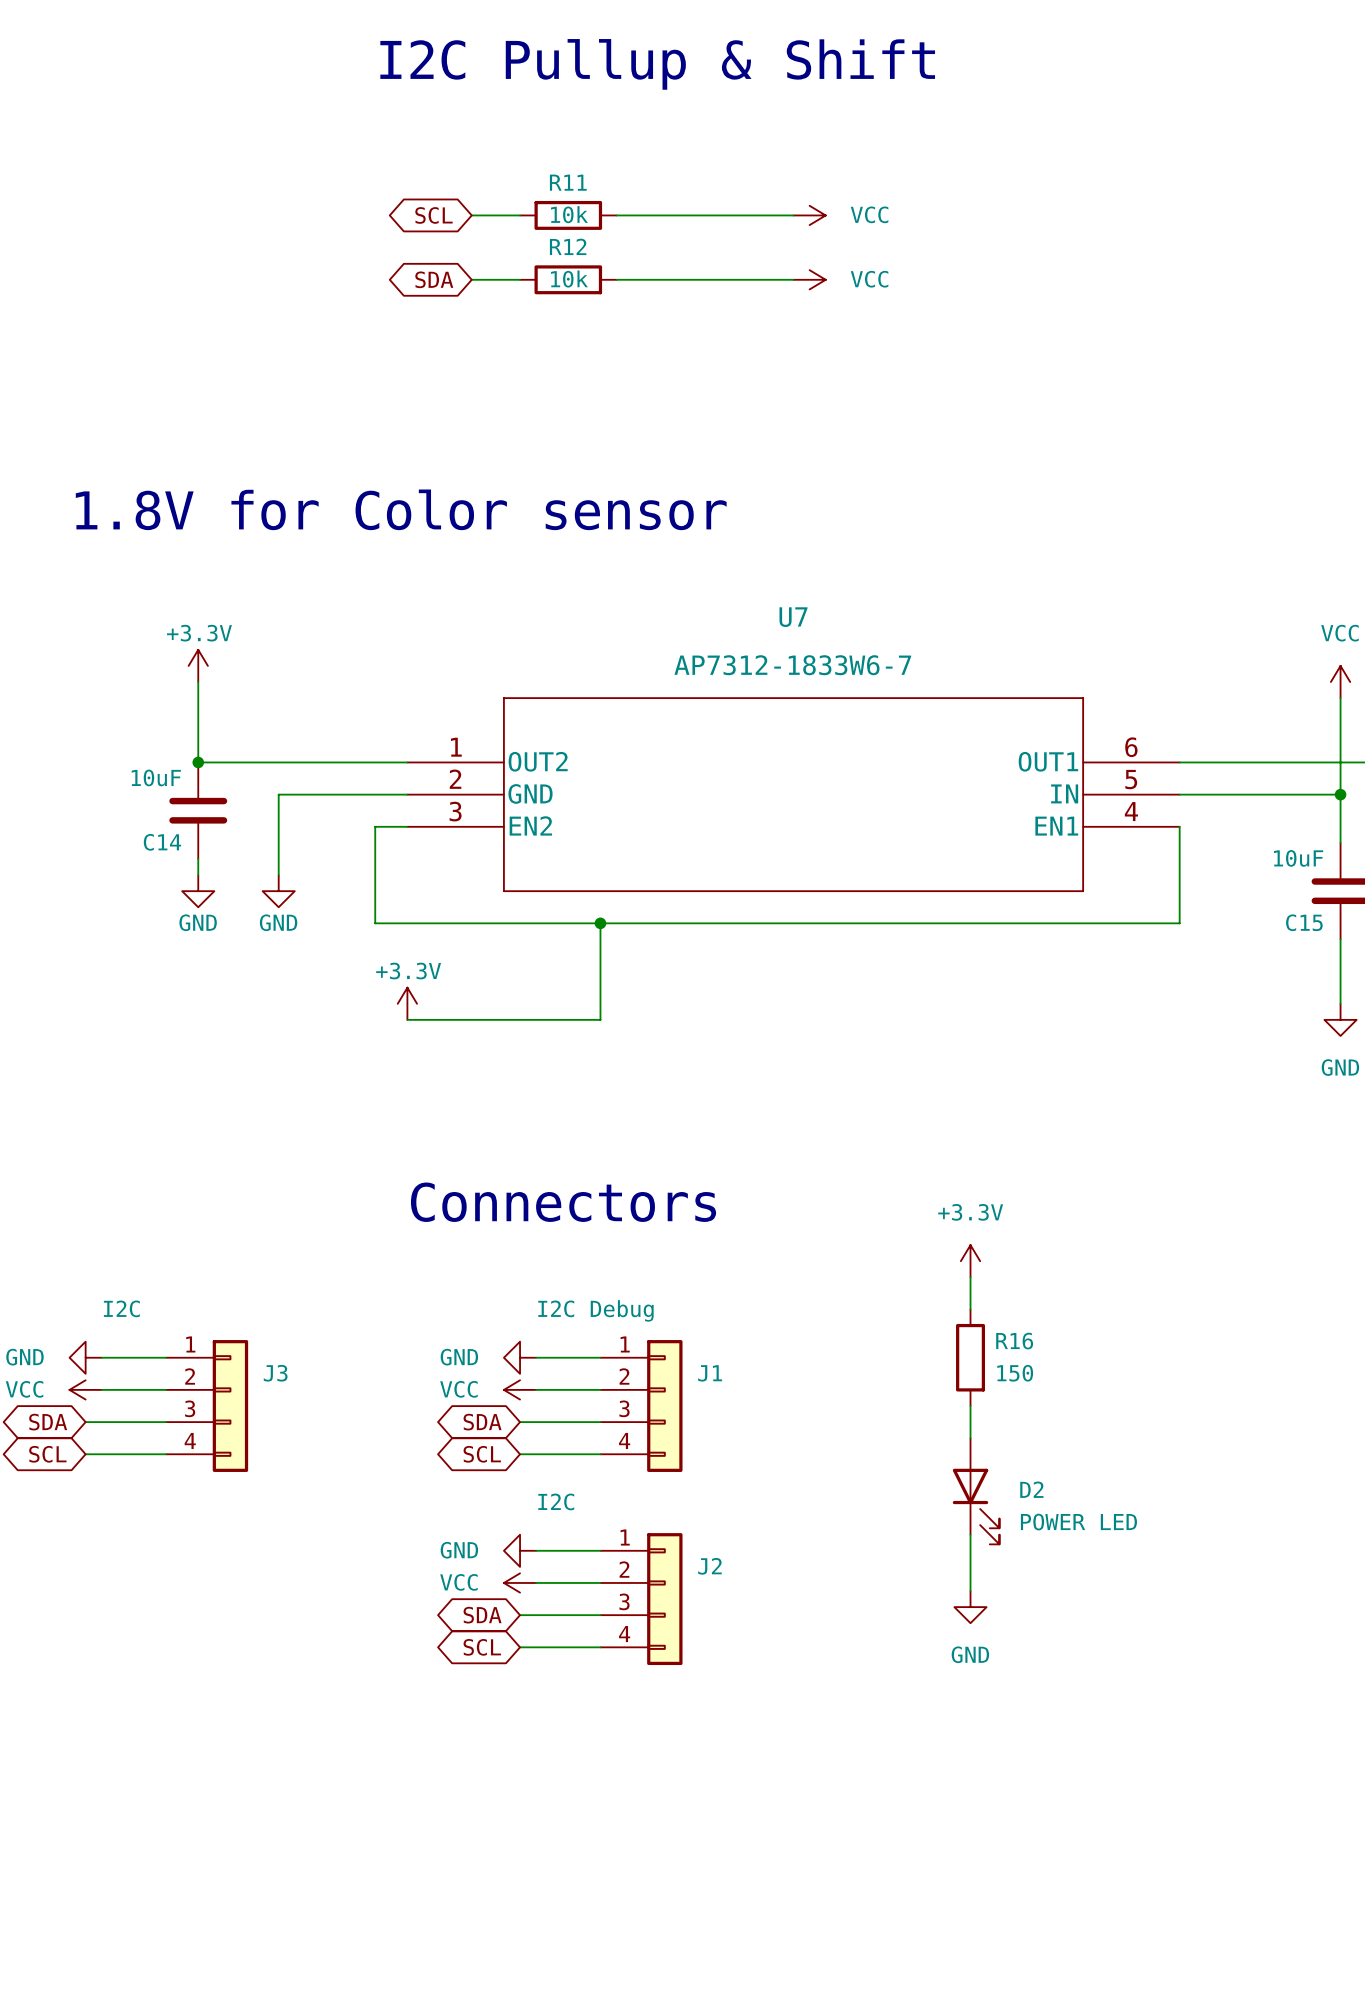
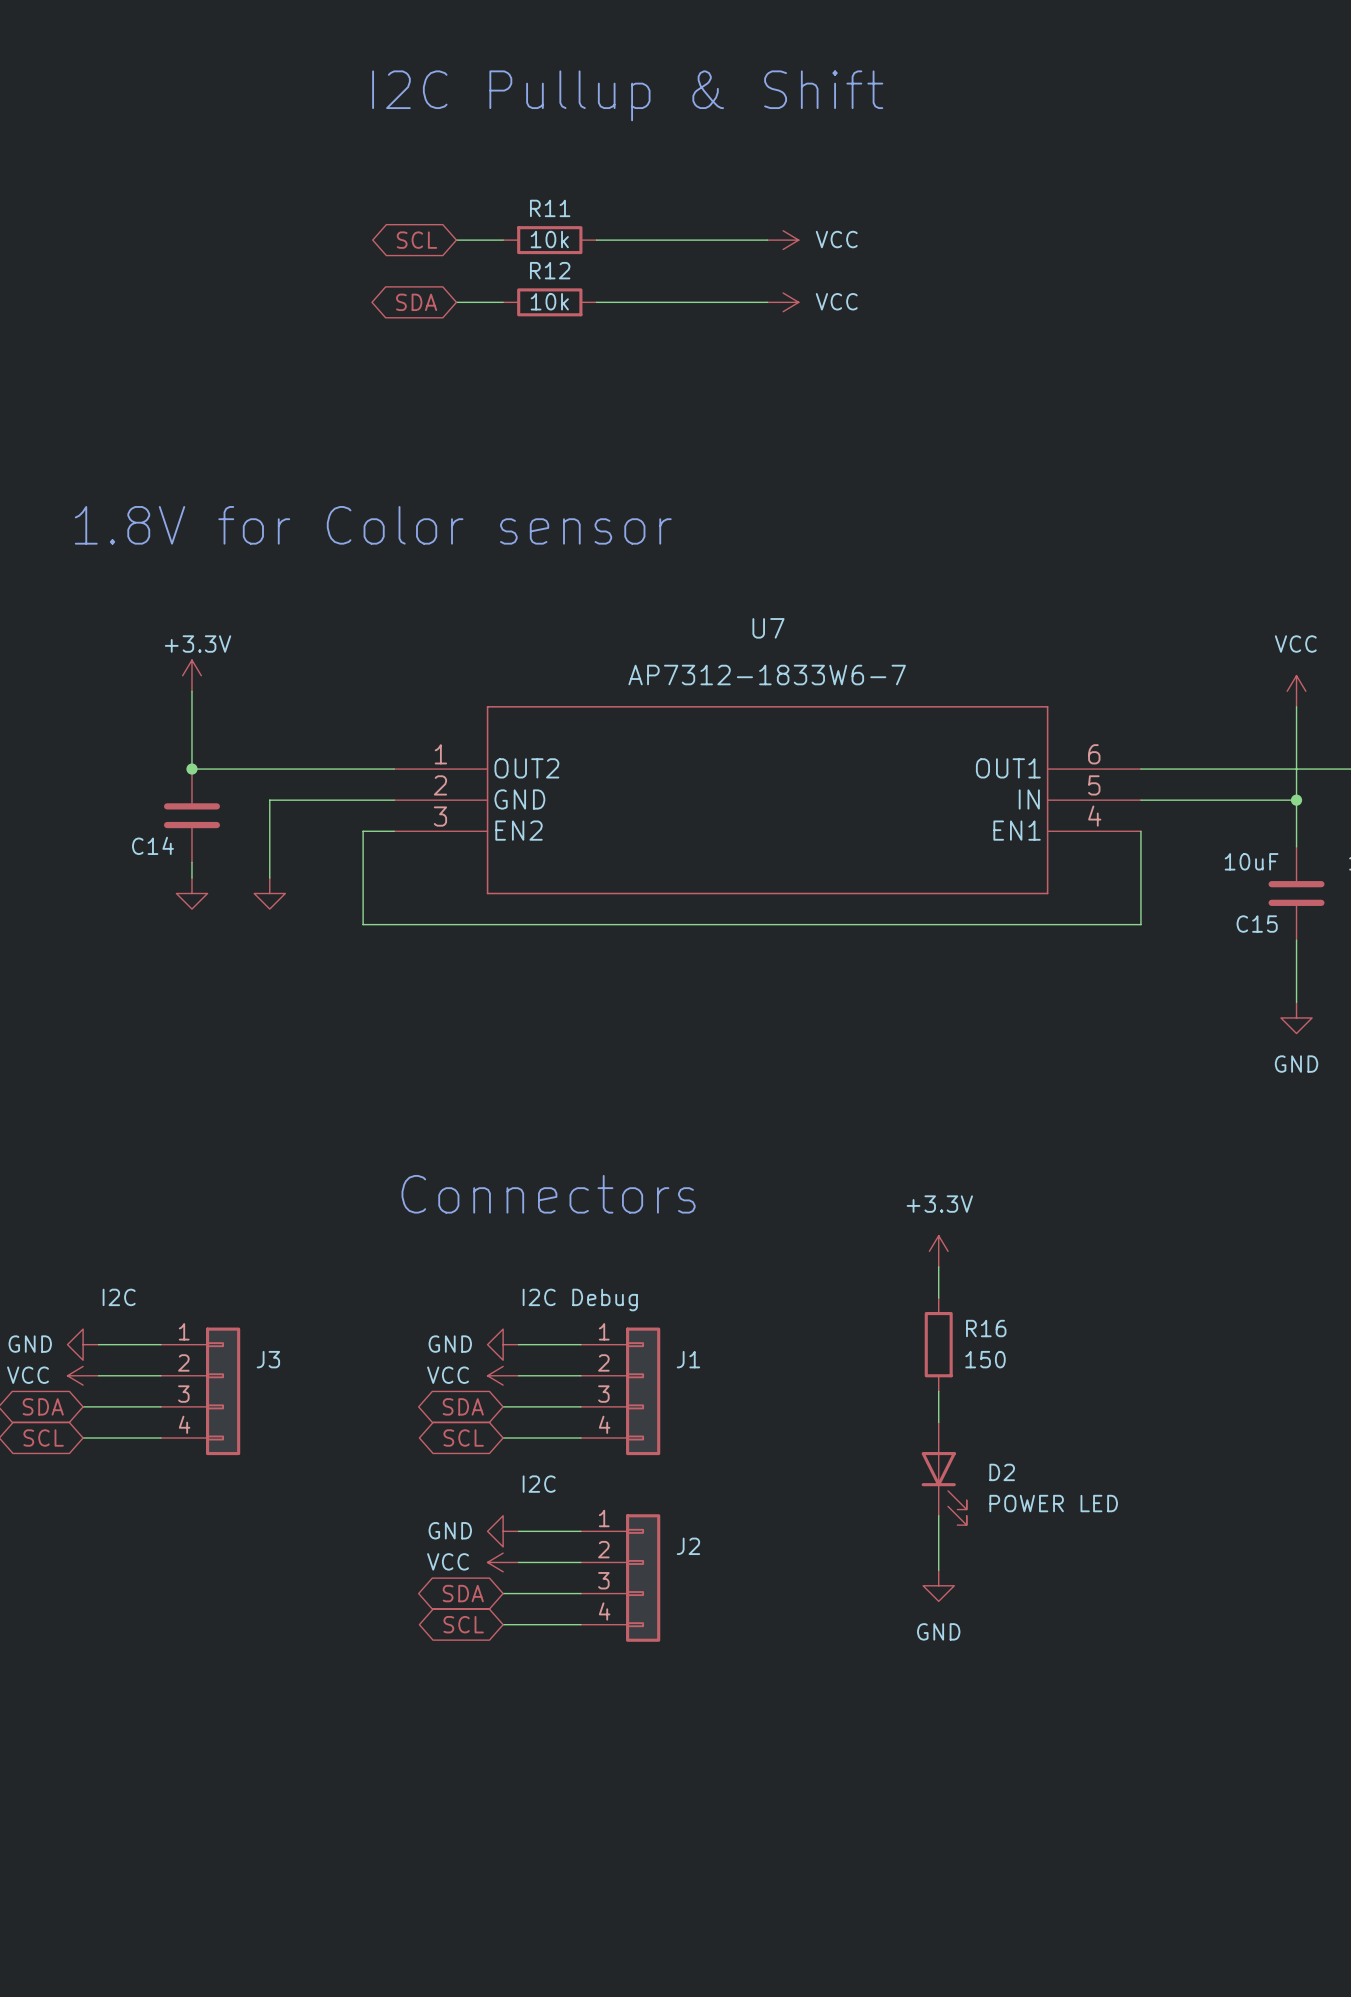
C14 value: 10uF (156, 777) -> none
power symbol text: GND (198, 922) -> none
power symbol text: GND (278, 922) -> none
wire: (600, 923) (600, 1019) (407, 1019) -> none
junction: (600, 923) -> none
power symbol: +3.3V (407, 1003) -> none

